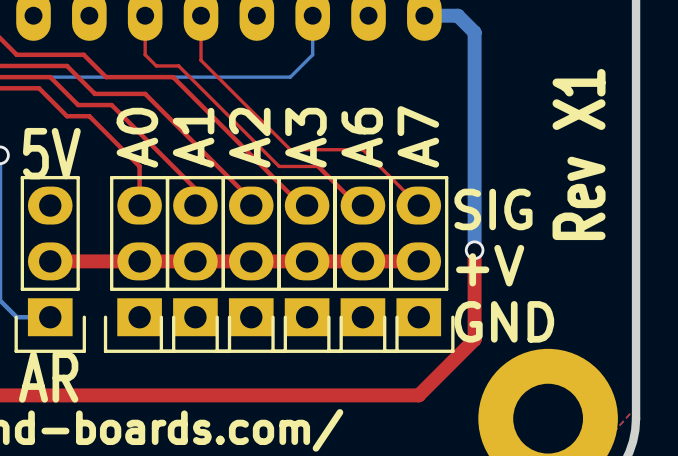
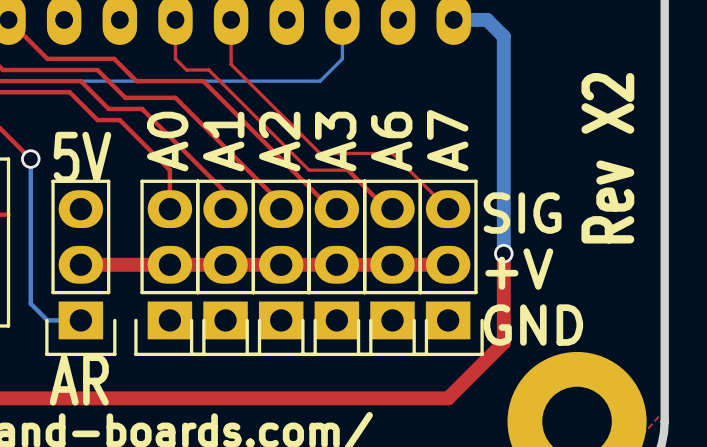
text: Rev X1 (579, 154) -> Rev X2 (607, 158)

